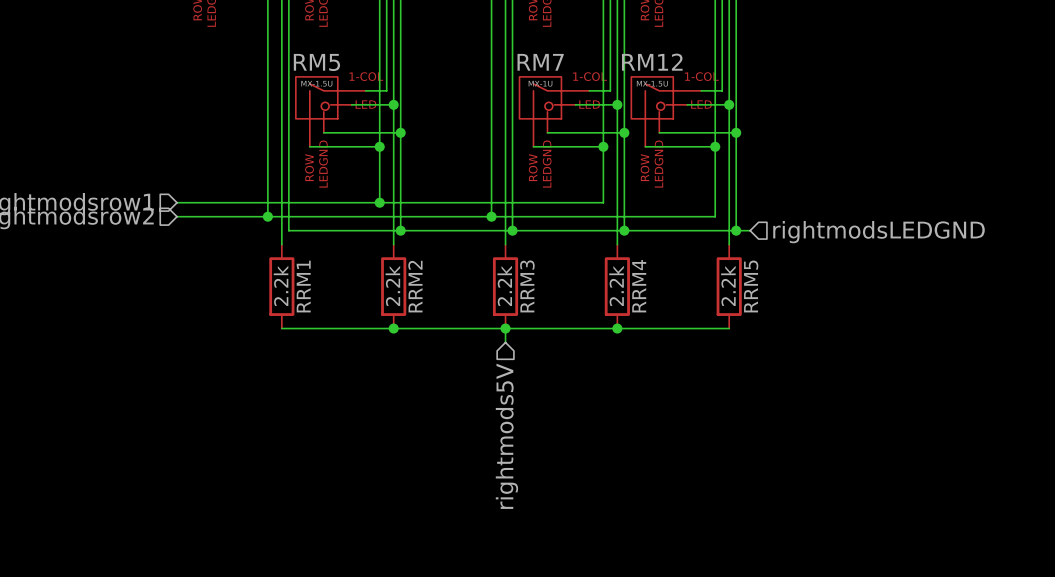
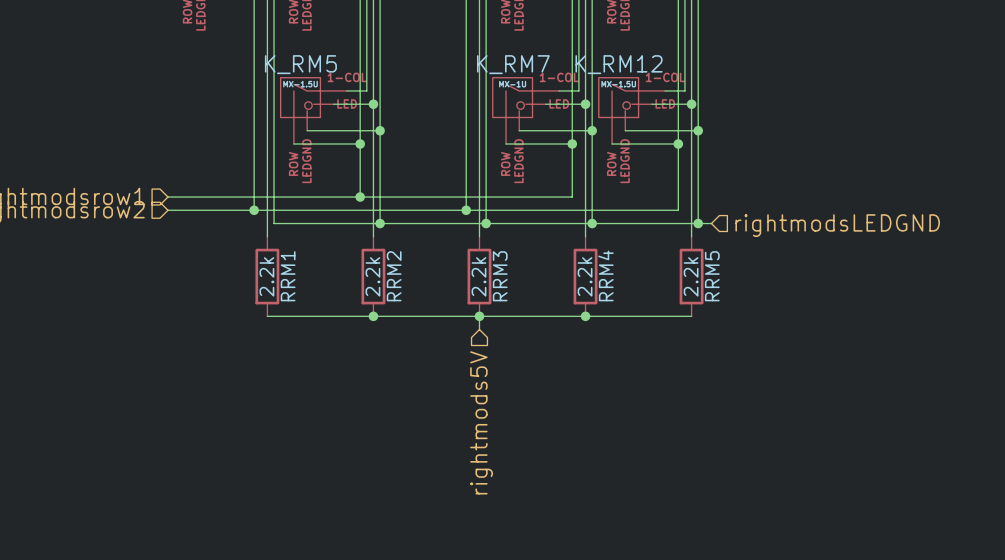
RM5 name: RM5 (316, 62) -> K_RM5 (300, 64)
RM7 name: RM7 (540, 62) -> K_RM7 (513, 64)
RM12 name: RM12 (652, 62) -> K_RM12 (619, 64)

